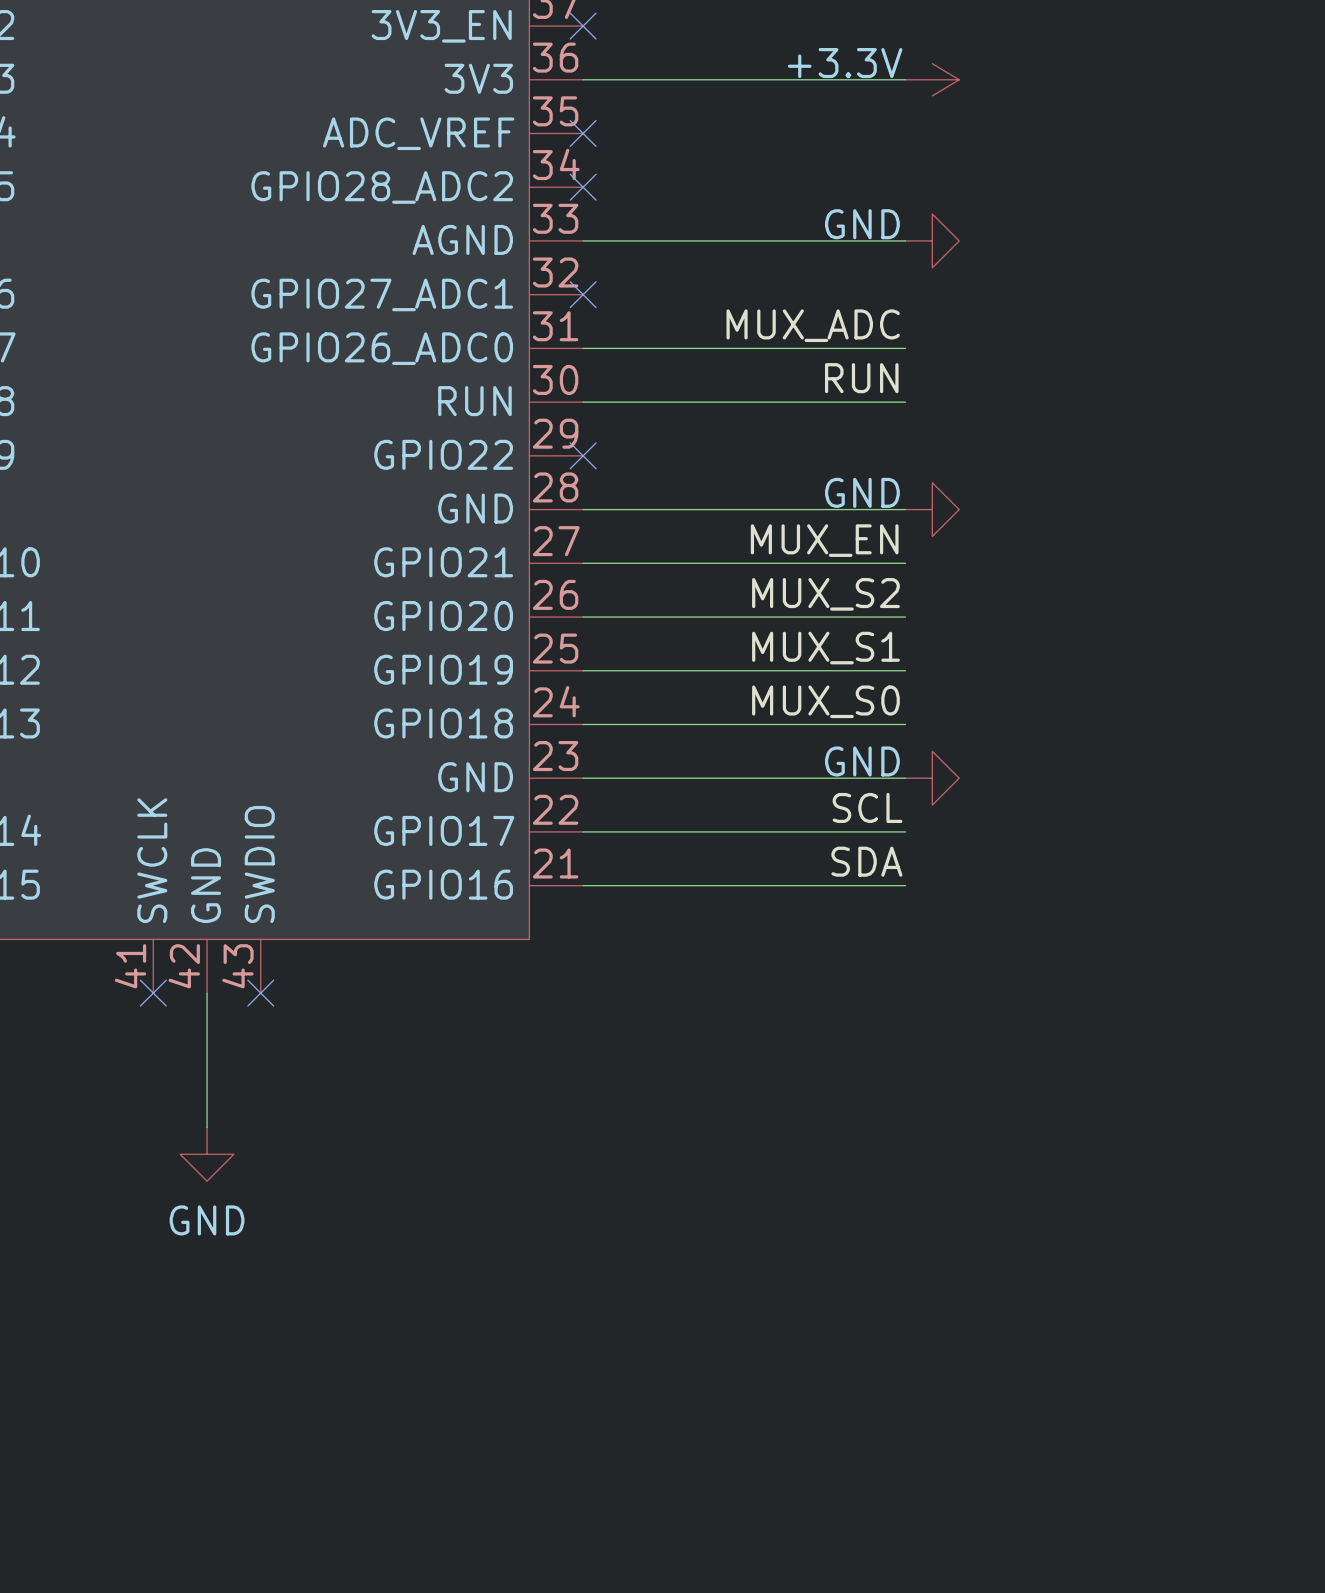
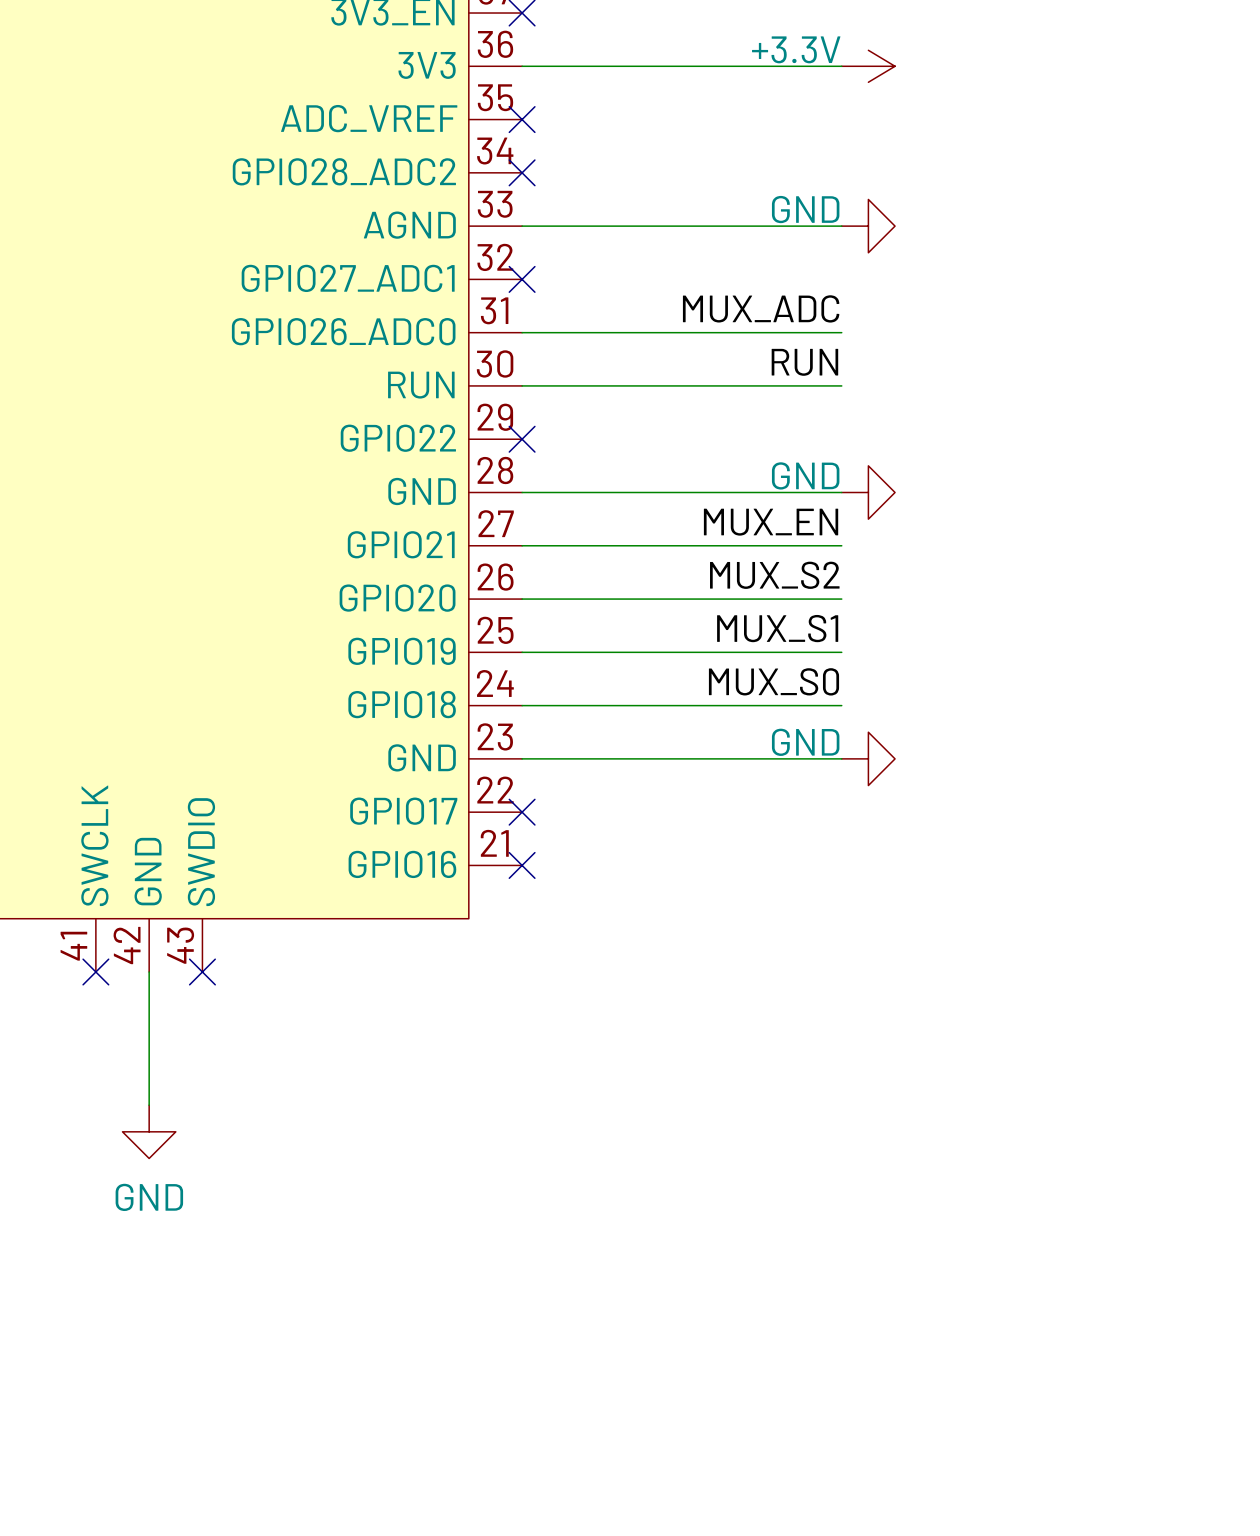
label: SCL (867, 807) -> none
wire: (583, 831) (905, 831) -> none
no-connect mark: none -> (522, 812)
label: SDA (866, 861) -> none
wire: (583, 885) (905, 885) -> none
no-connect mark: none -> (522, 865)

